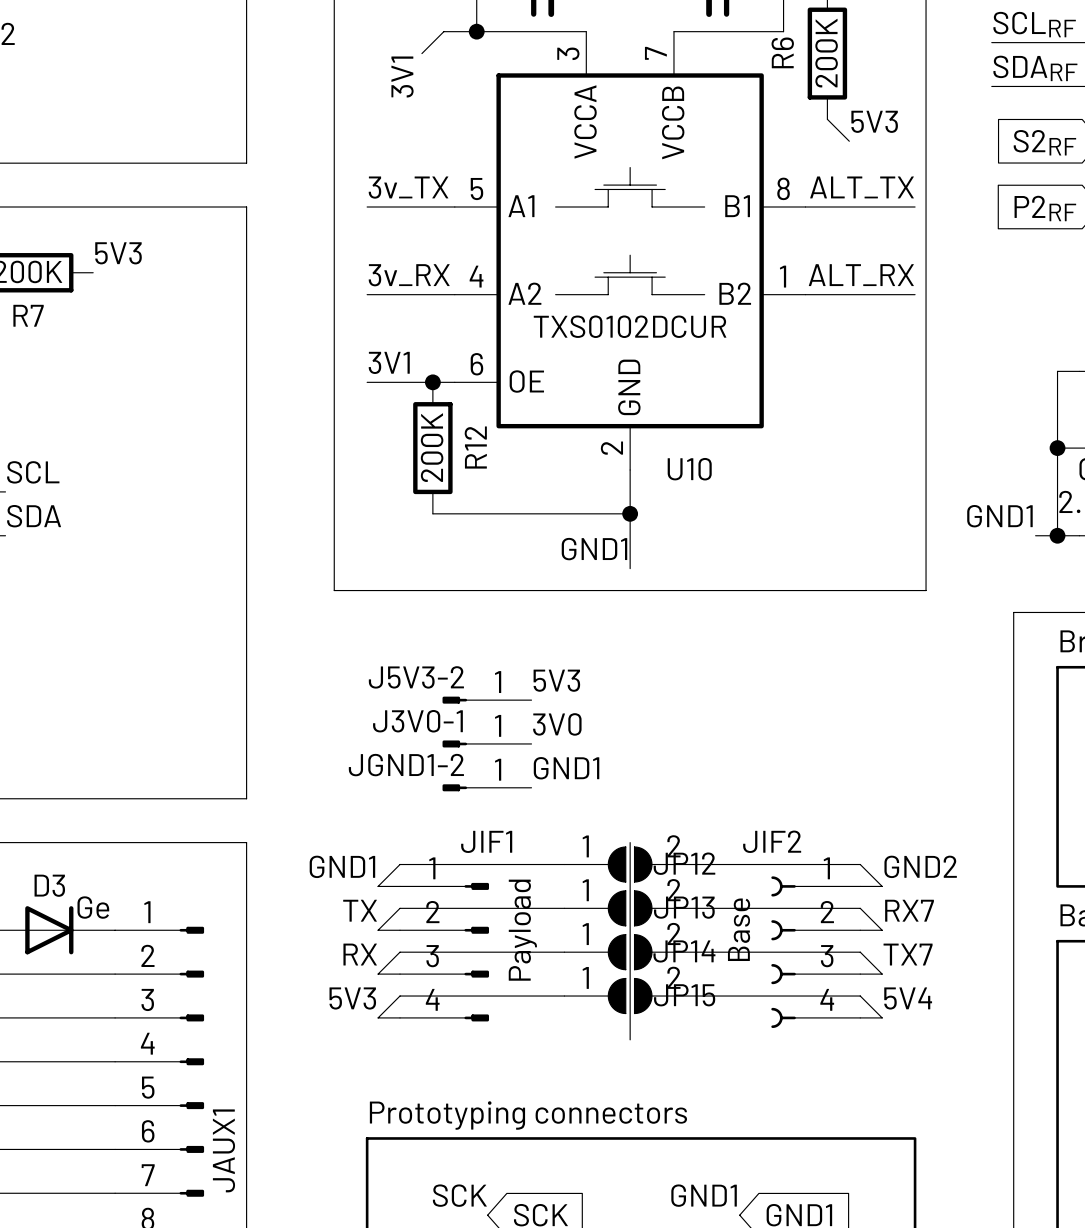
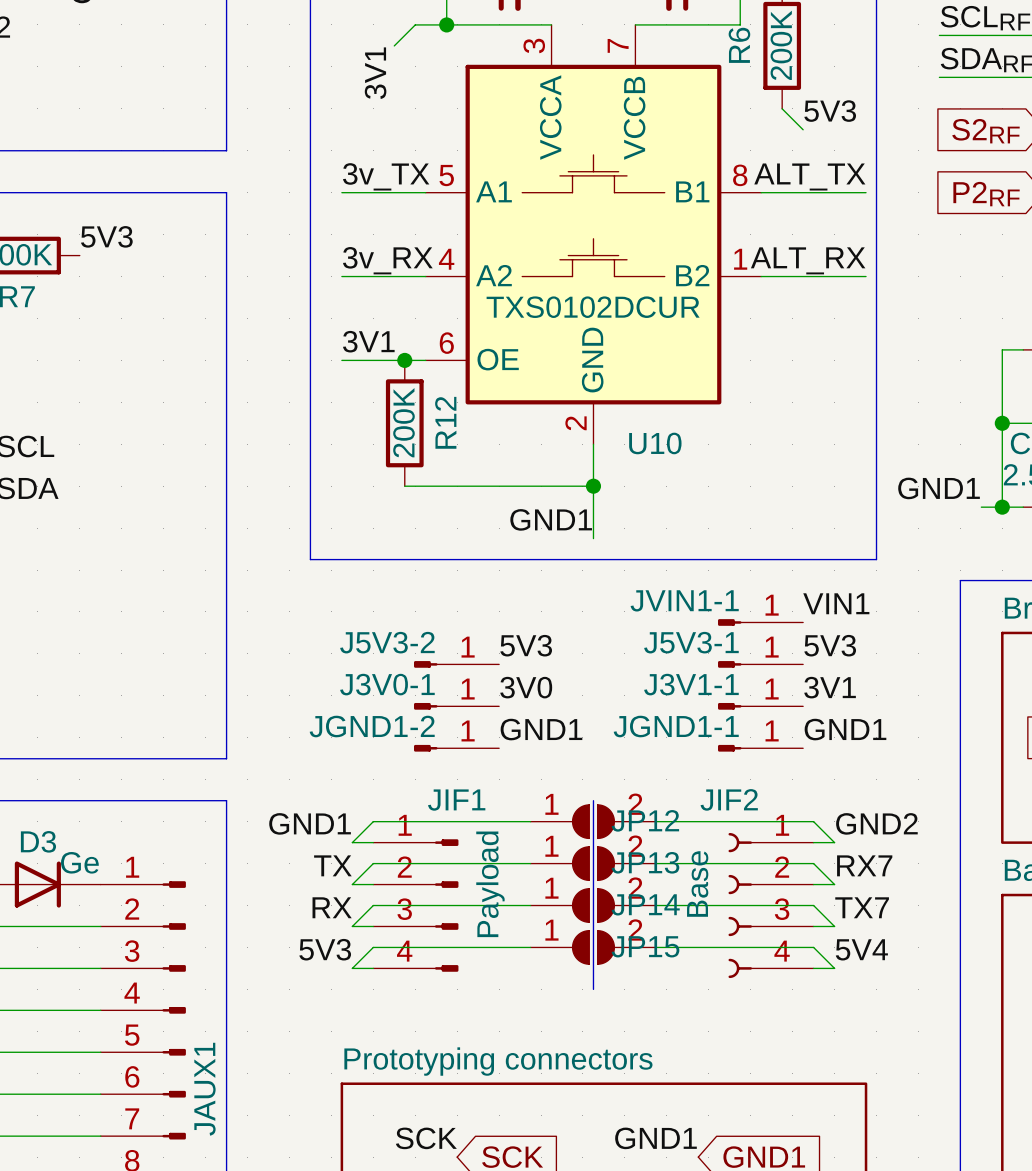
label: none -> VIN1 (836, 603)
JVIN1-1: none -> (760, 622)
label: none -> 5V3 (830, 645)
J5V3-1: none -> (760, 664)
label: none -> 3V1 (830, 687)
J3V1-1: none -> (760, 706)
label: none -> GND1 (845, 729)
JGND1-1: none -> (760, 748)

